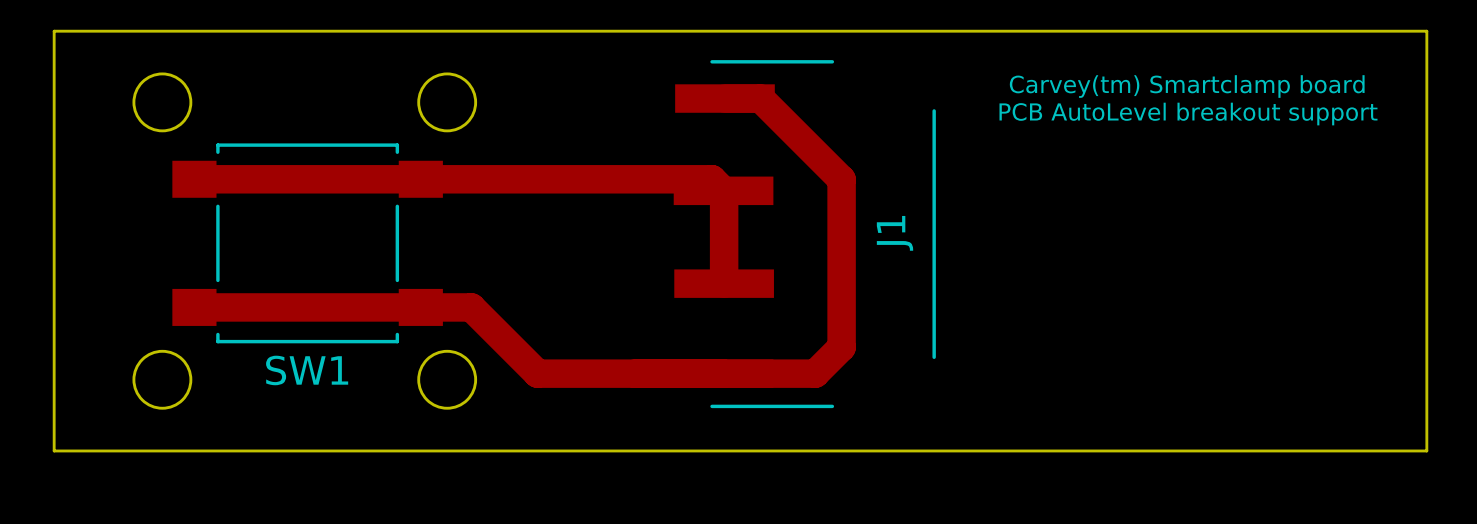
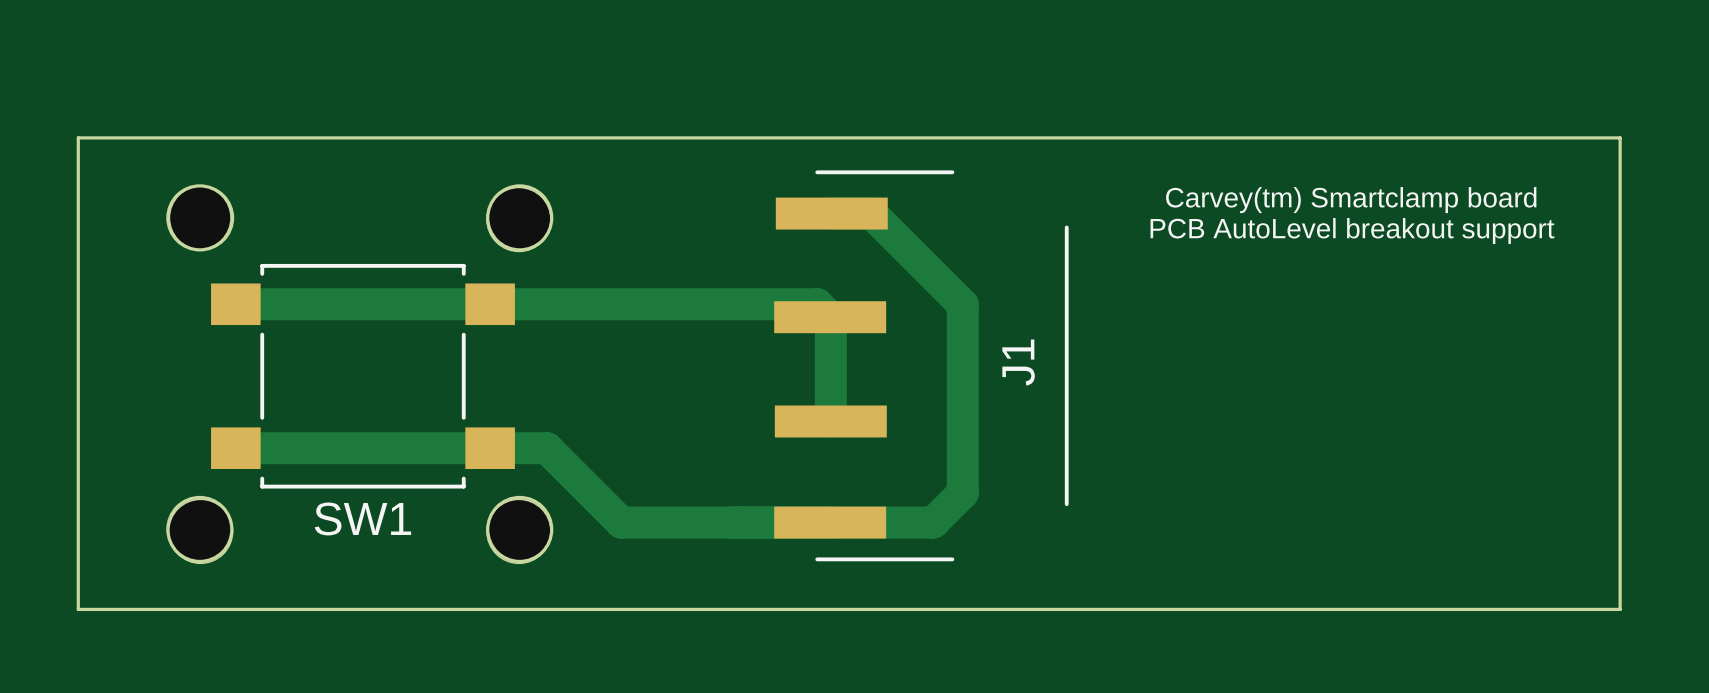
part: none -> (201, 217)
part: none -> (518, 219)
part: none -> (200, 531)
part: none -> (518, 531)

